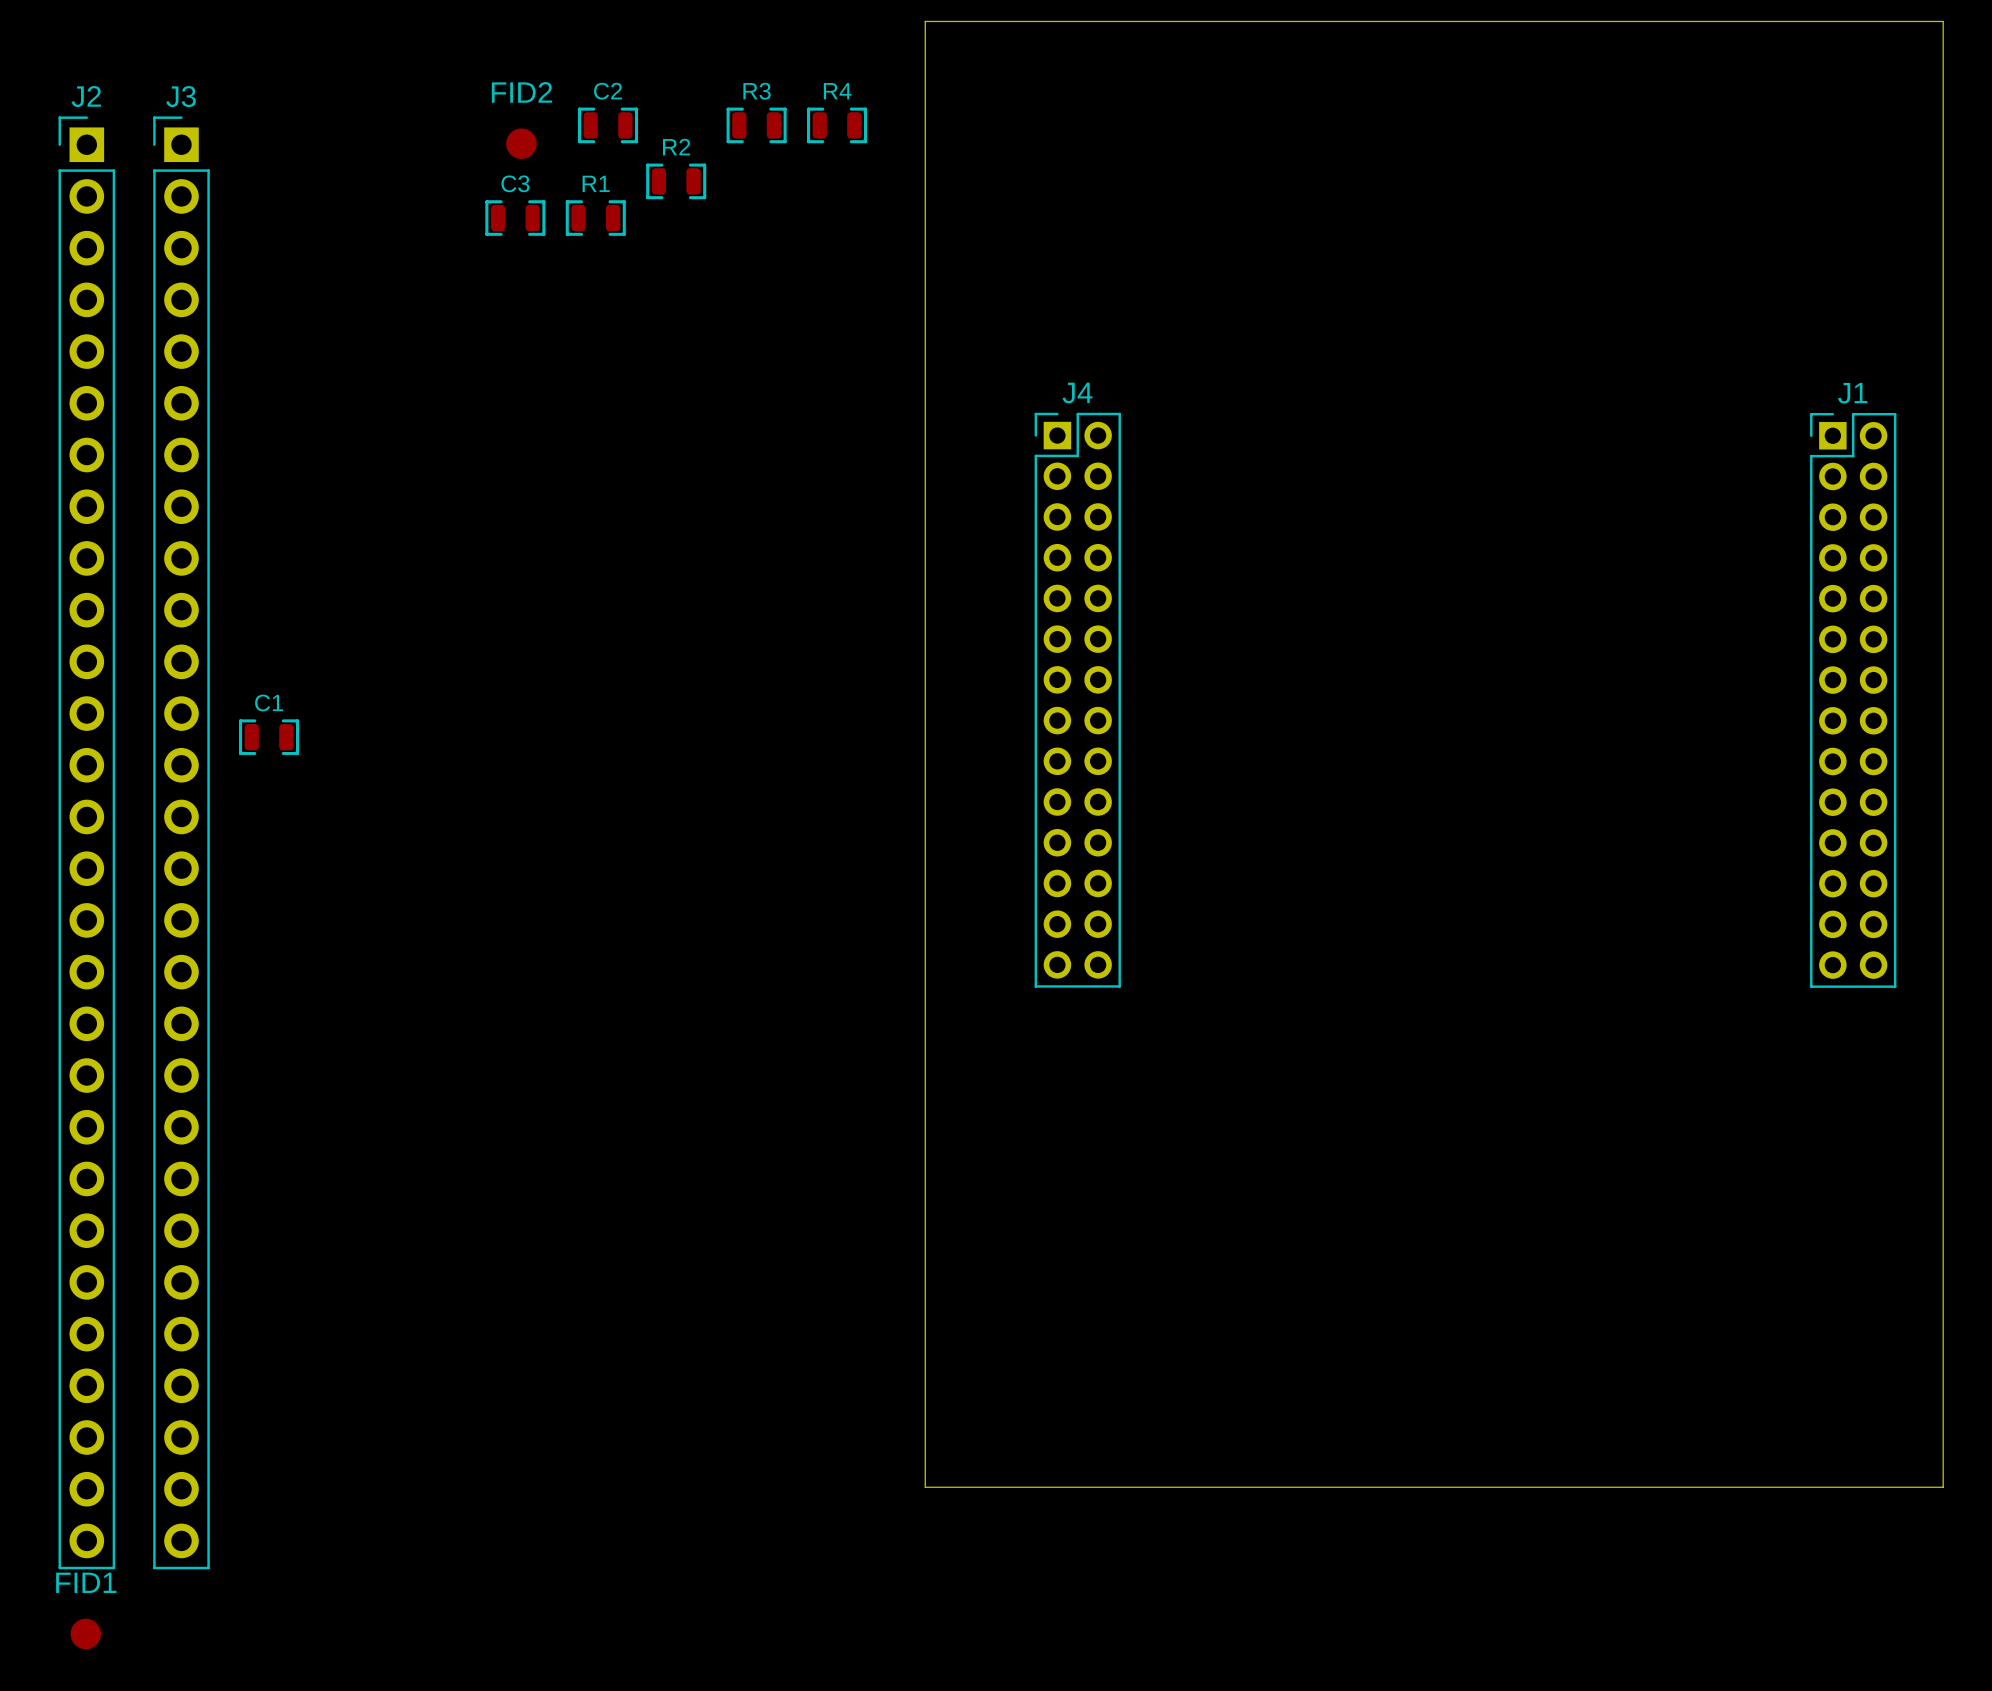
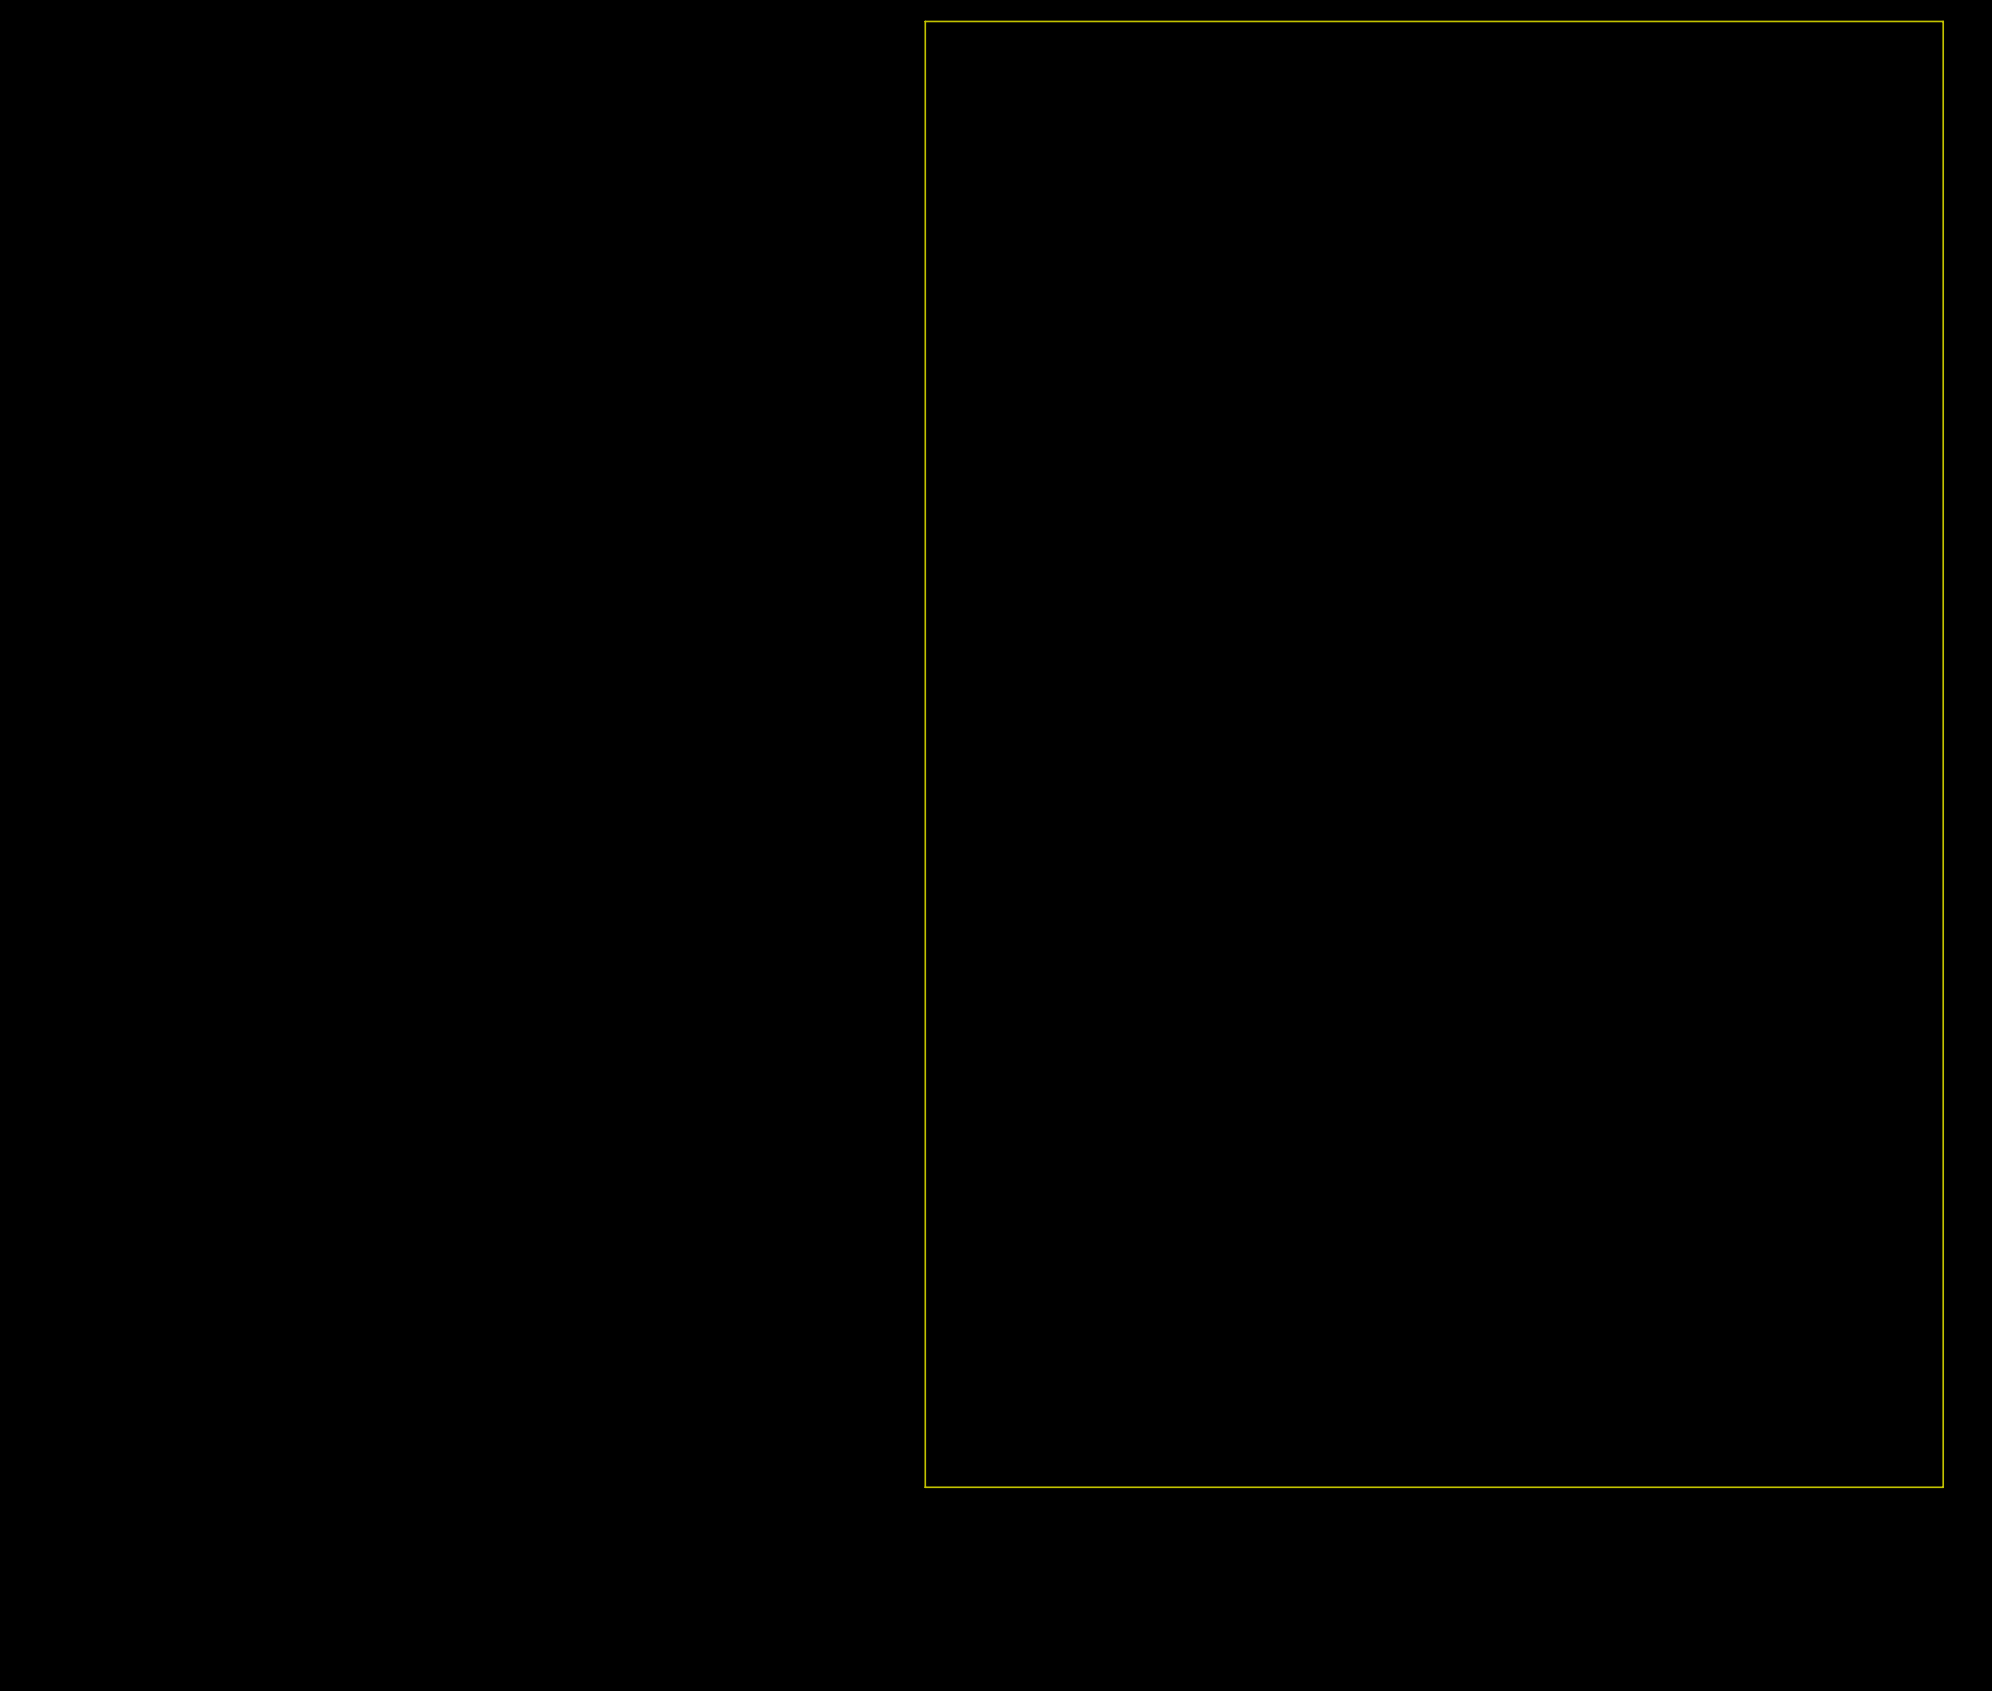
C2: (607, 125) -> none
R3: (756, 125) -> none
R4: (837, 125) -> none
FID2: (521, 143) -> none
R2: (676, 181) -> none
C3: (515, 218) -> none
R1: (595, 218) -> none
J4: (1077, 700) -> none
J1: (1853, 700) -> none
C1: (269, 737) -> none
J2: (86, 842) -> none
J3: (181, 842) -> none
FID1: (85, 1633) -> none

